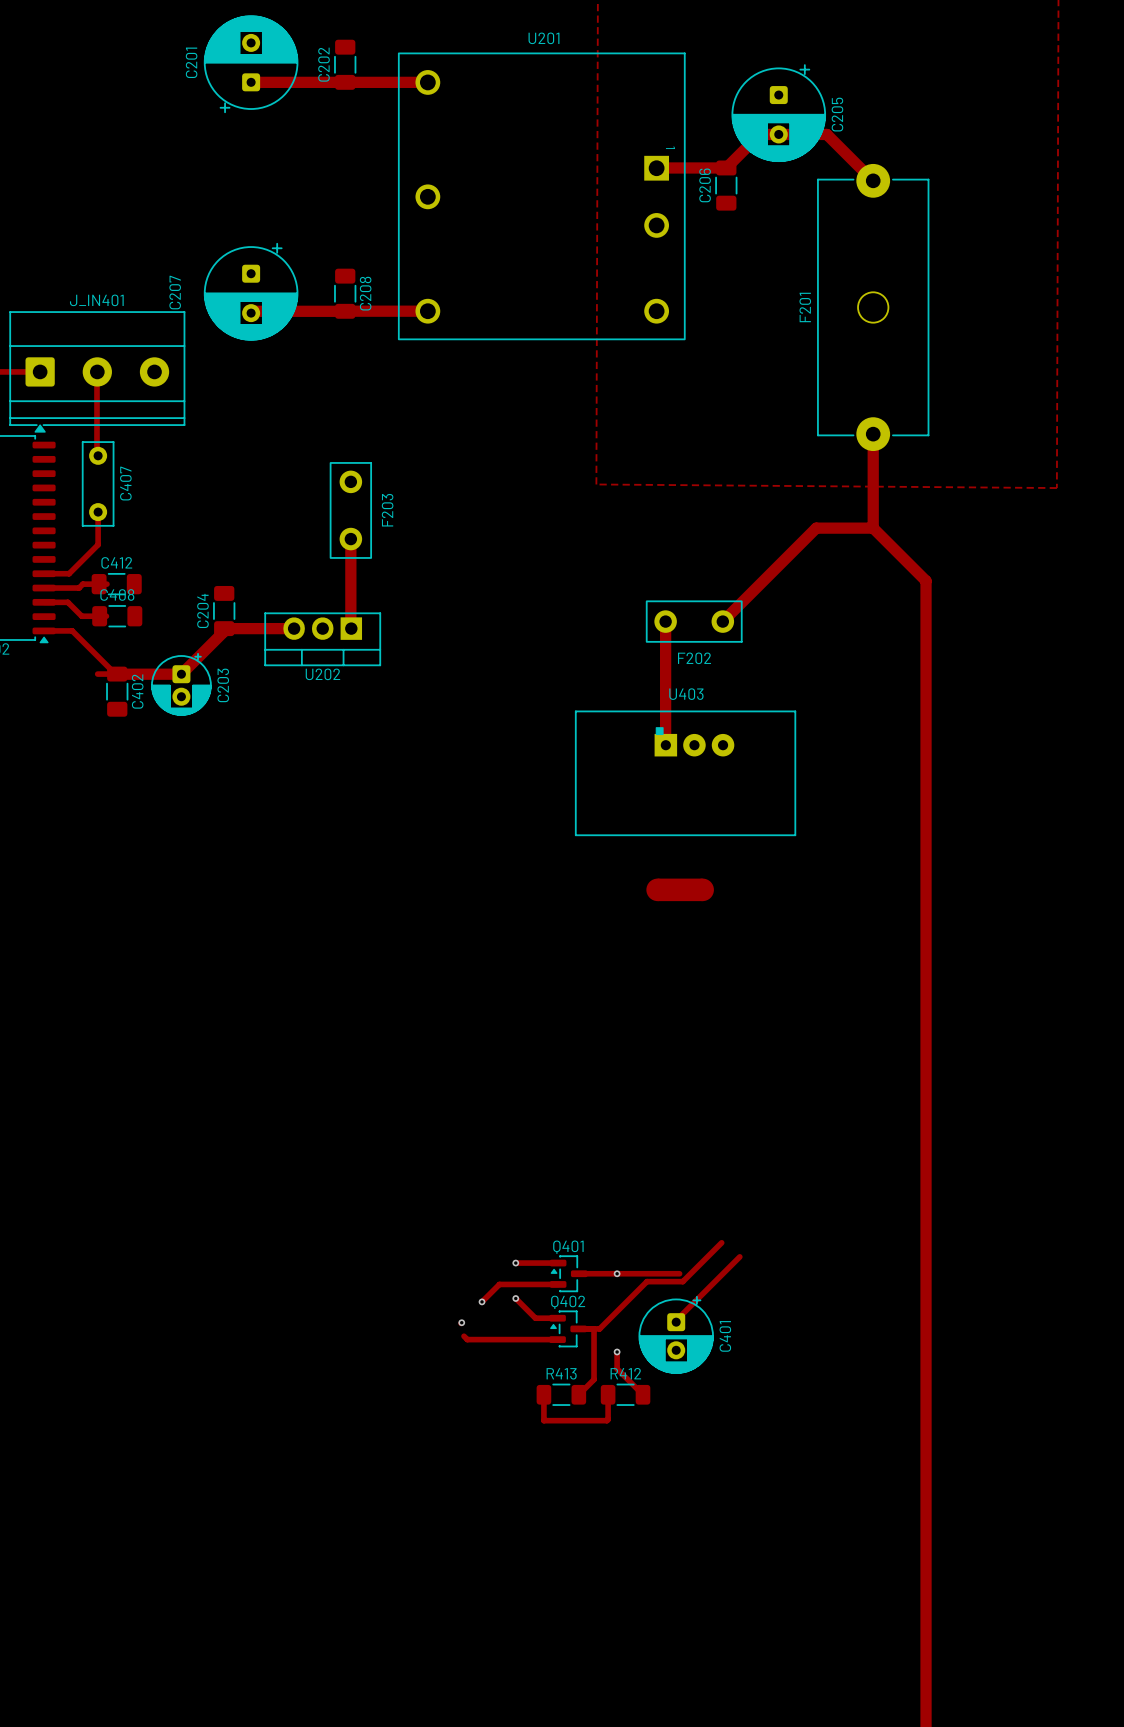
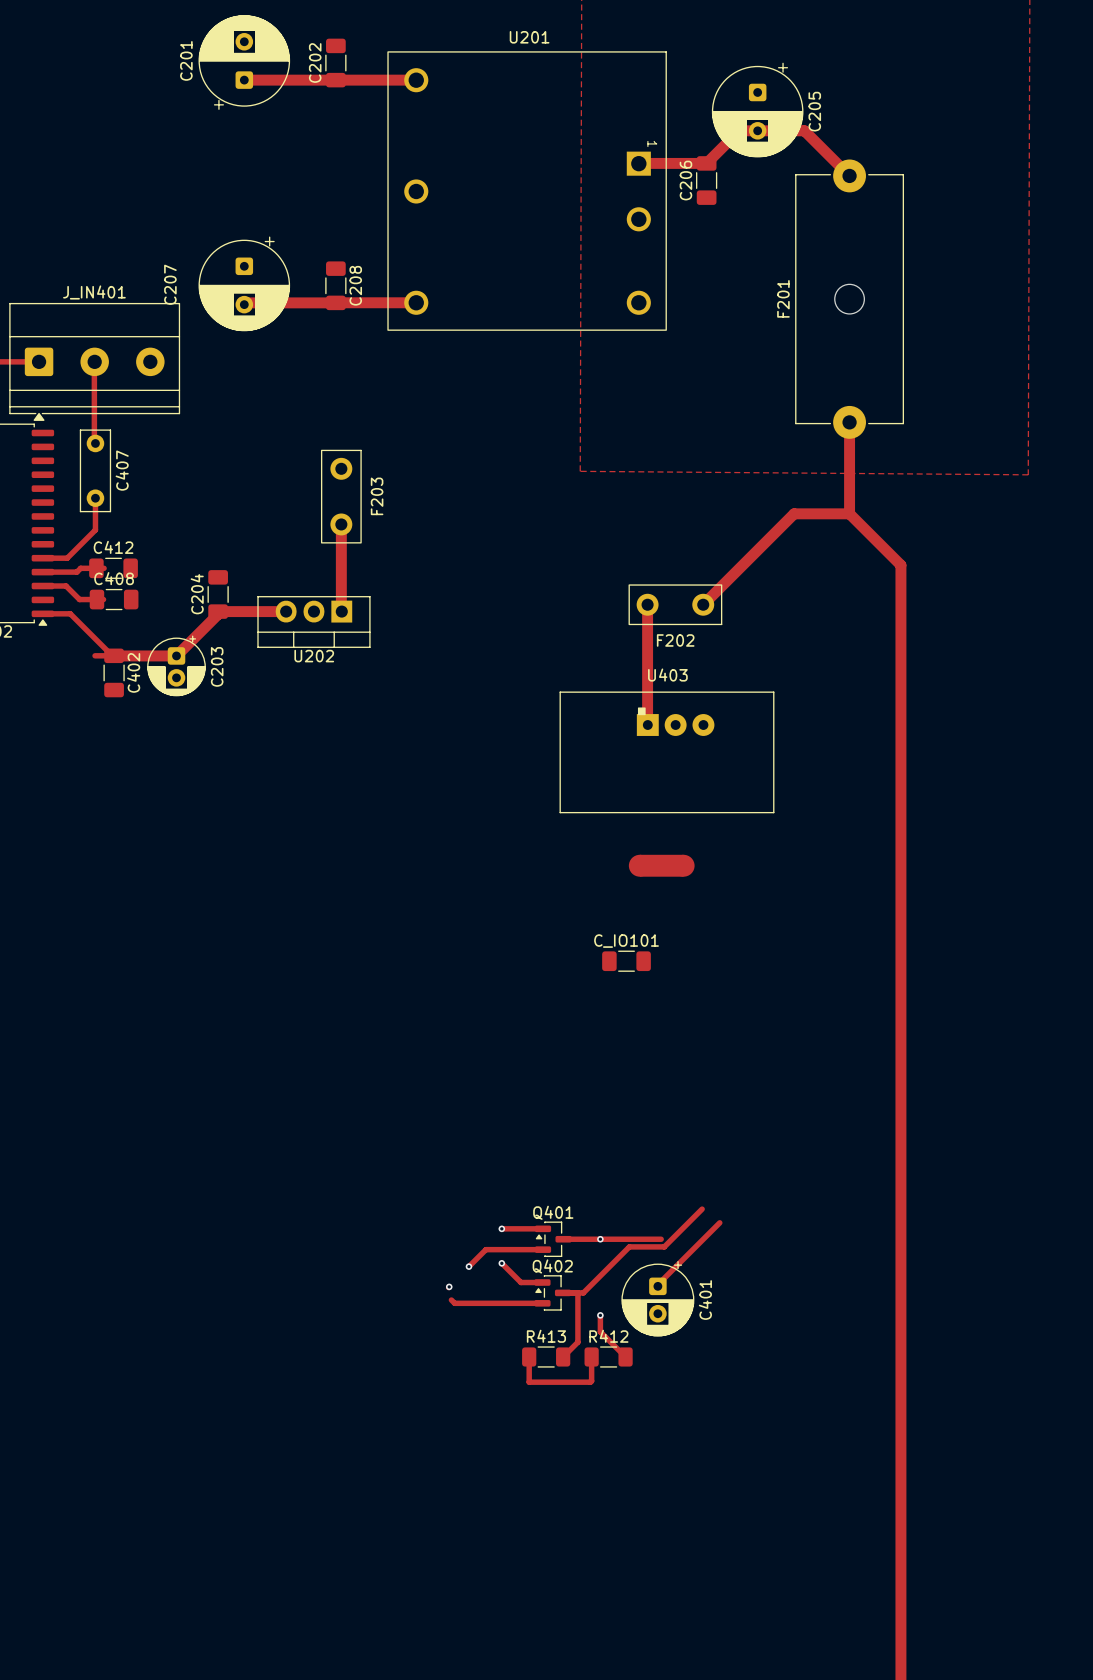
C_IO101: none -> (626, 961)

